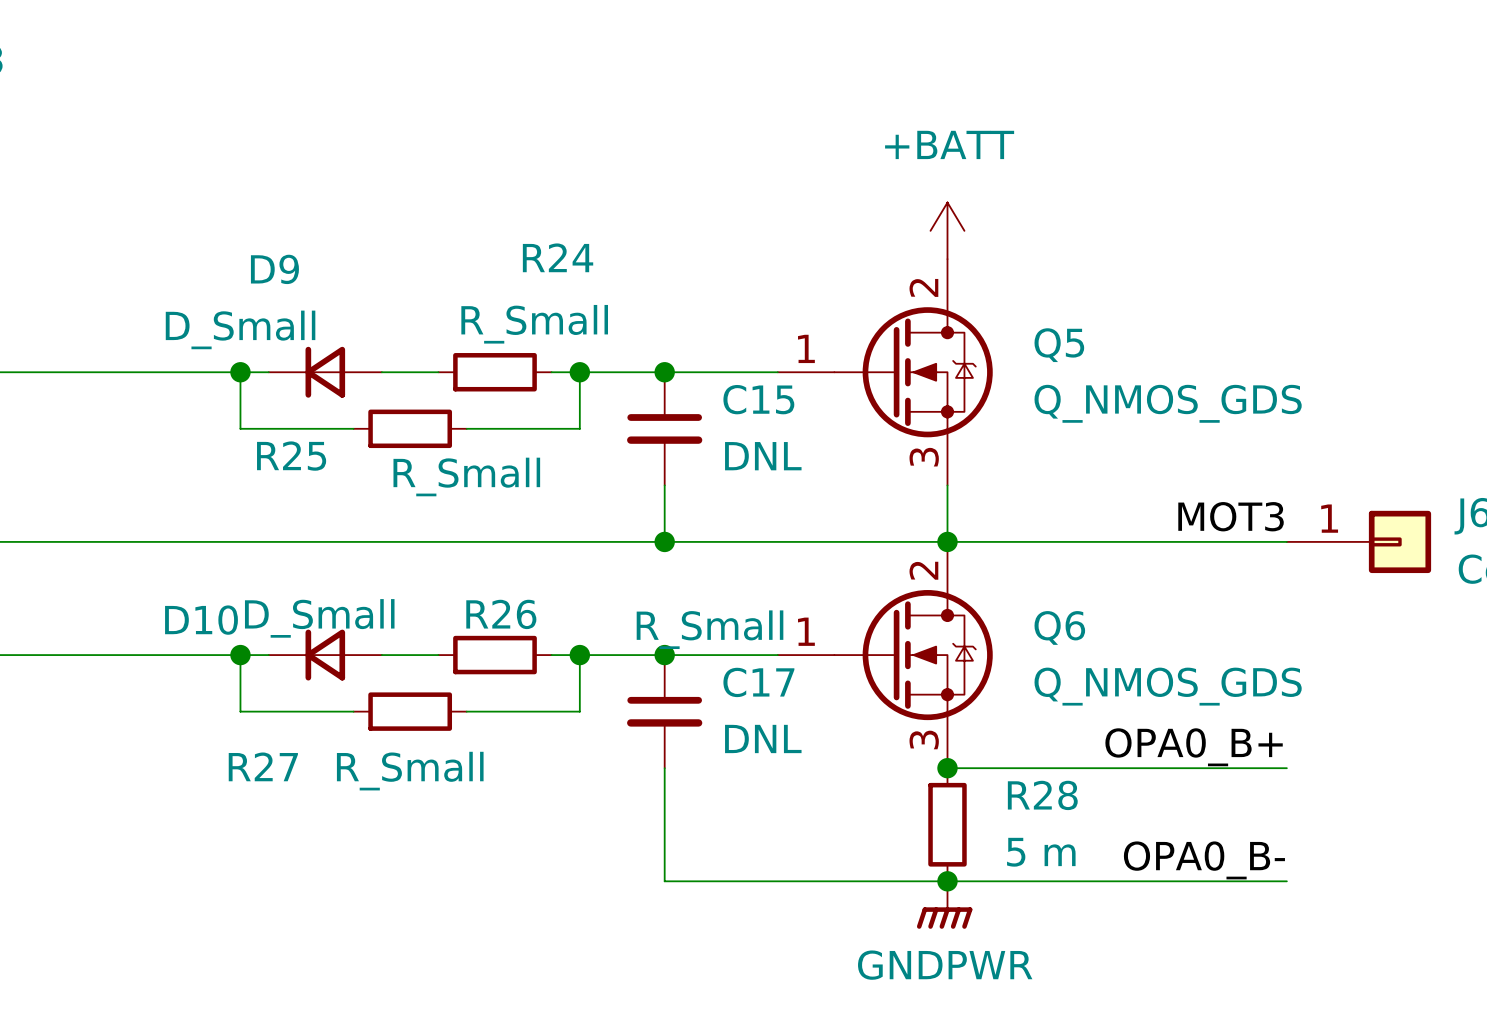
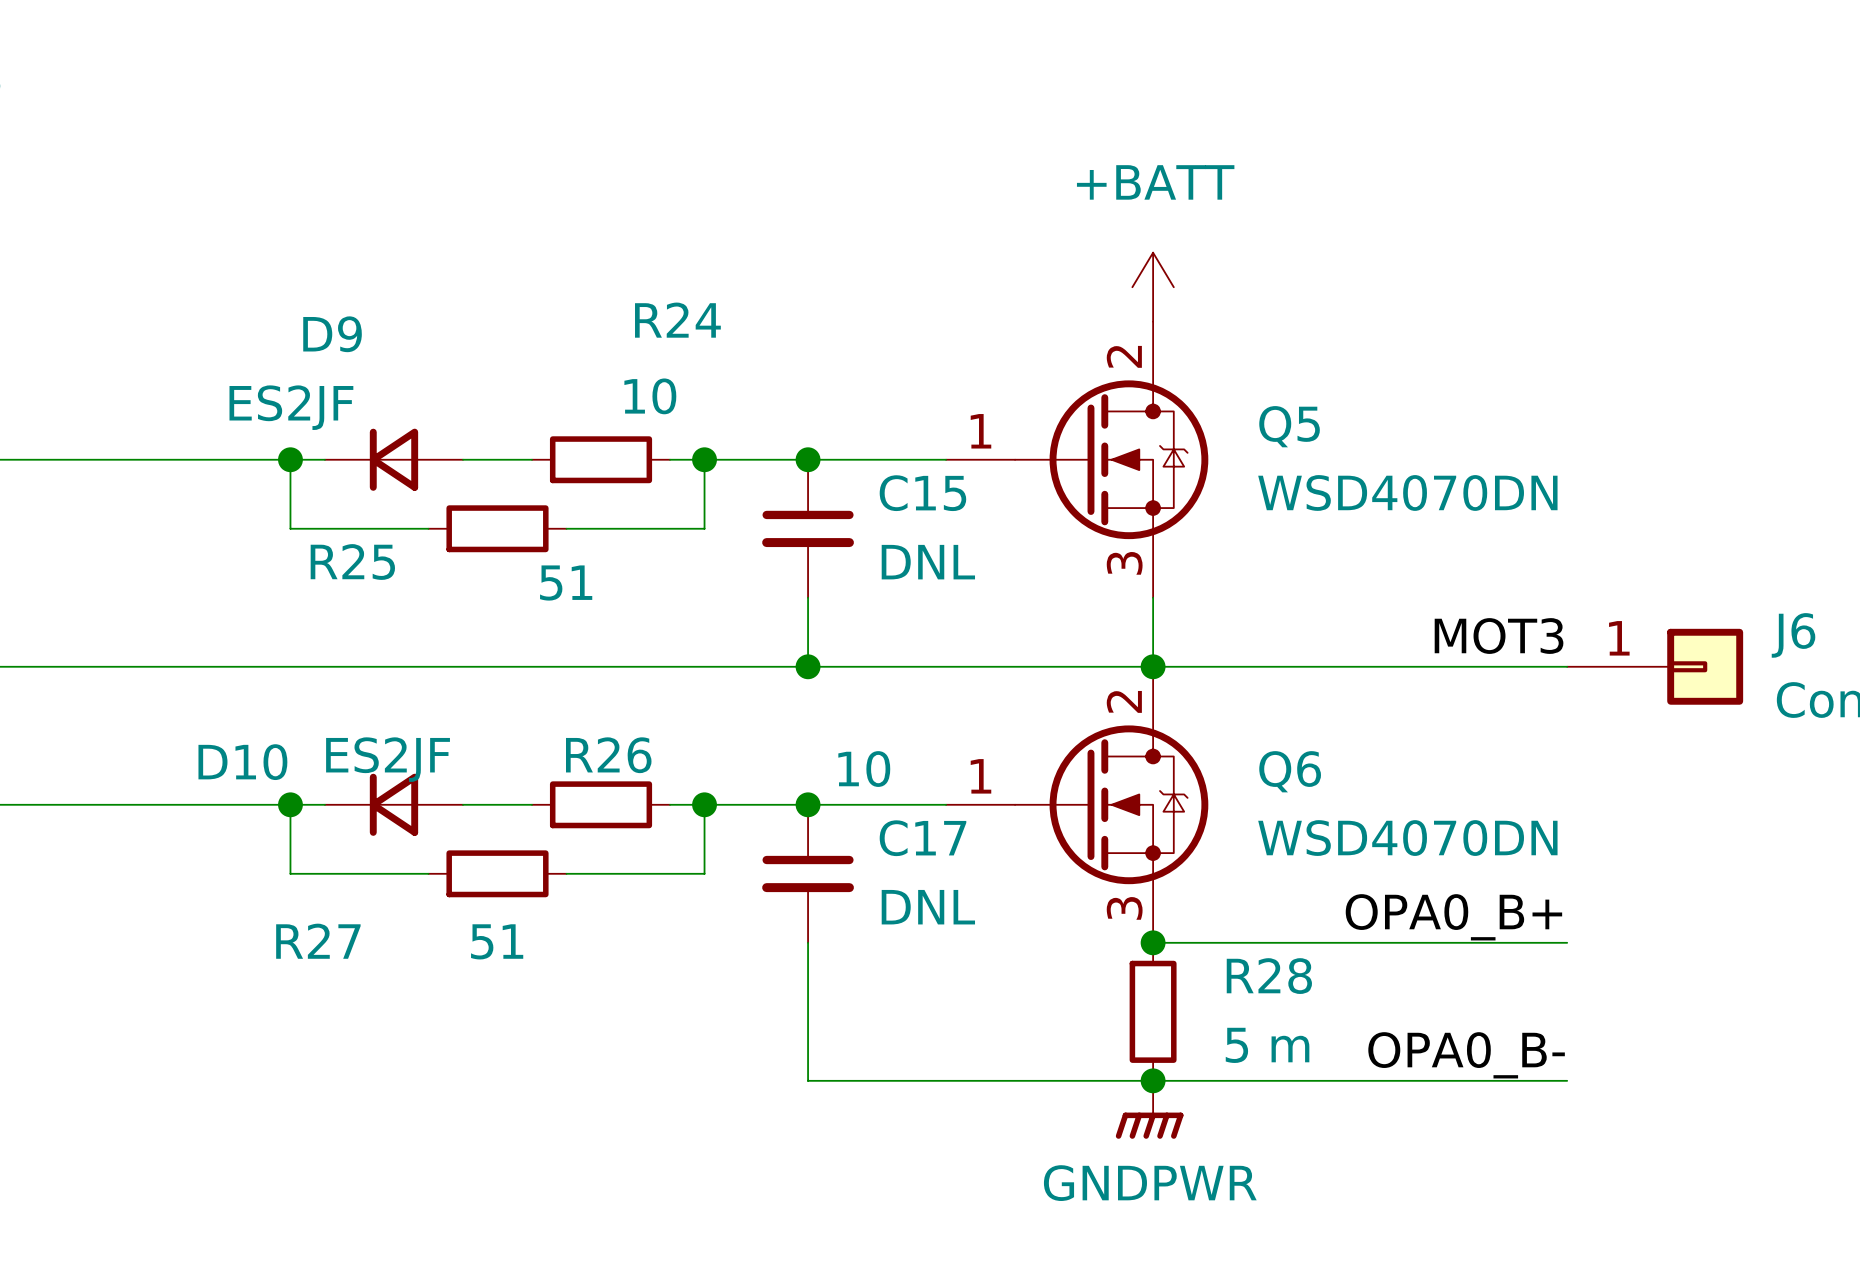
R24 value: R_Small (534, 324) -> 10 (650, 396)
D9 value: D_Small (240, 329) -> ES2JF (291, 407)
Q5 value: Q_NMOS_GDS (1168, 403) -> WSD4070DN (1407, 492)
R25 value: R_Small (466, 476) -> 51 (566, 583)
D10 value: D_Small (319, 618) -> ES2JF (388, 759)
R26 value: R_Small (710, 629) -> 10 (864, 769)
Q6 value: Q_NMOS_GDS (1168, 686) -> WSD4070DN (1407, 838)
R27 value: R_Small (410, 771) -> 51 (497, 941)

